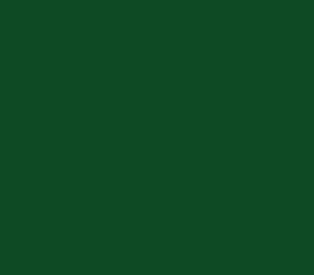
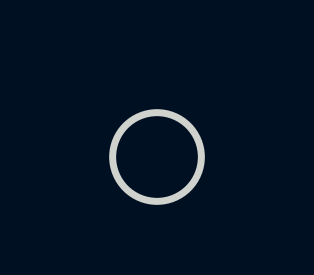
round board edge: none -> [109, 109, 205, 205]

